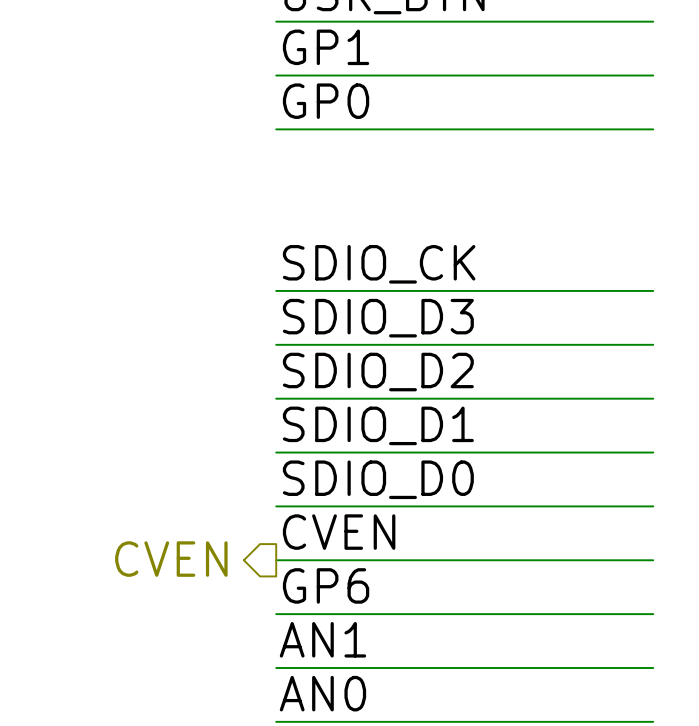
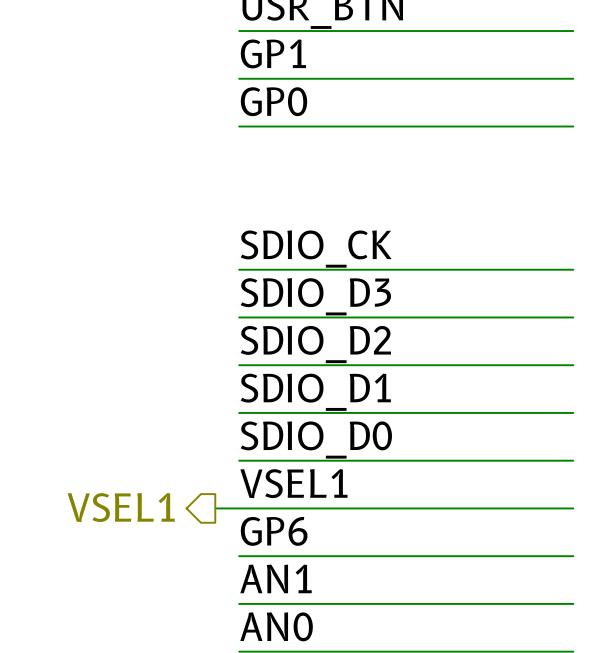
label: CVEN (339, 532) -> VSEL1 (293, 483)
hierarchical label: none -> VSEL1 (121, 507)
hierarchical label: CVEN (171, 559) -> none
wire: none -> (215, 508) (239, 508)

